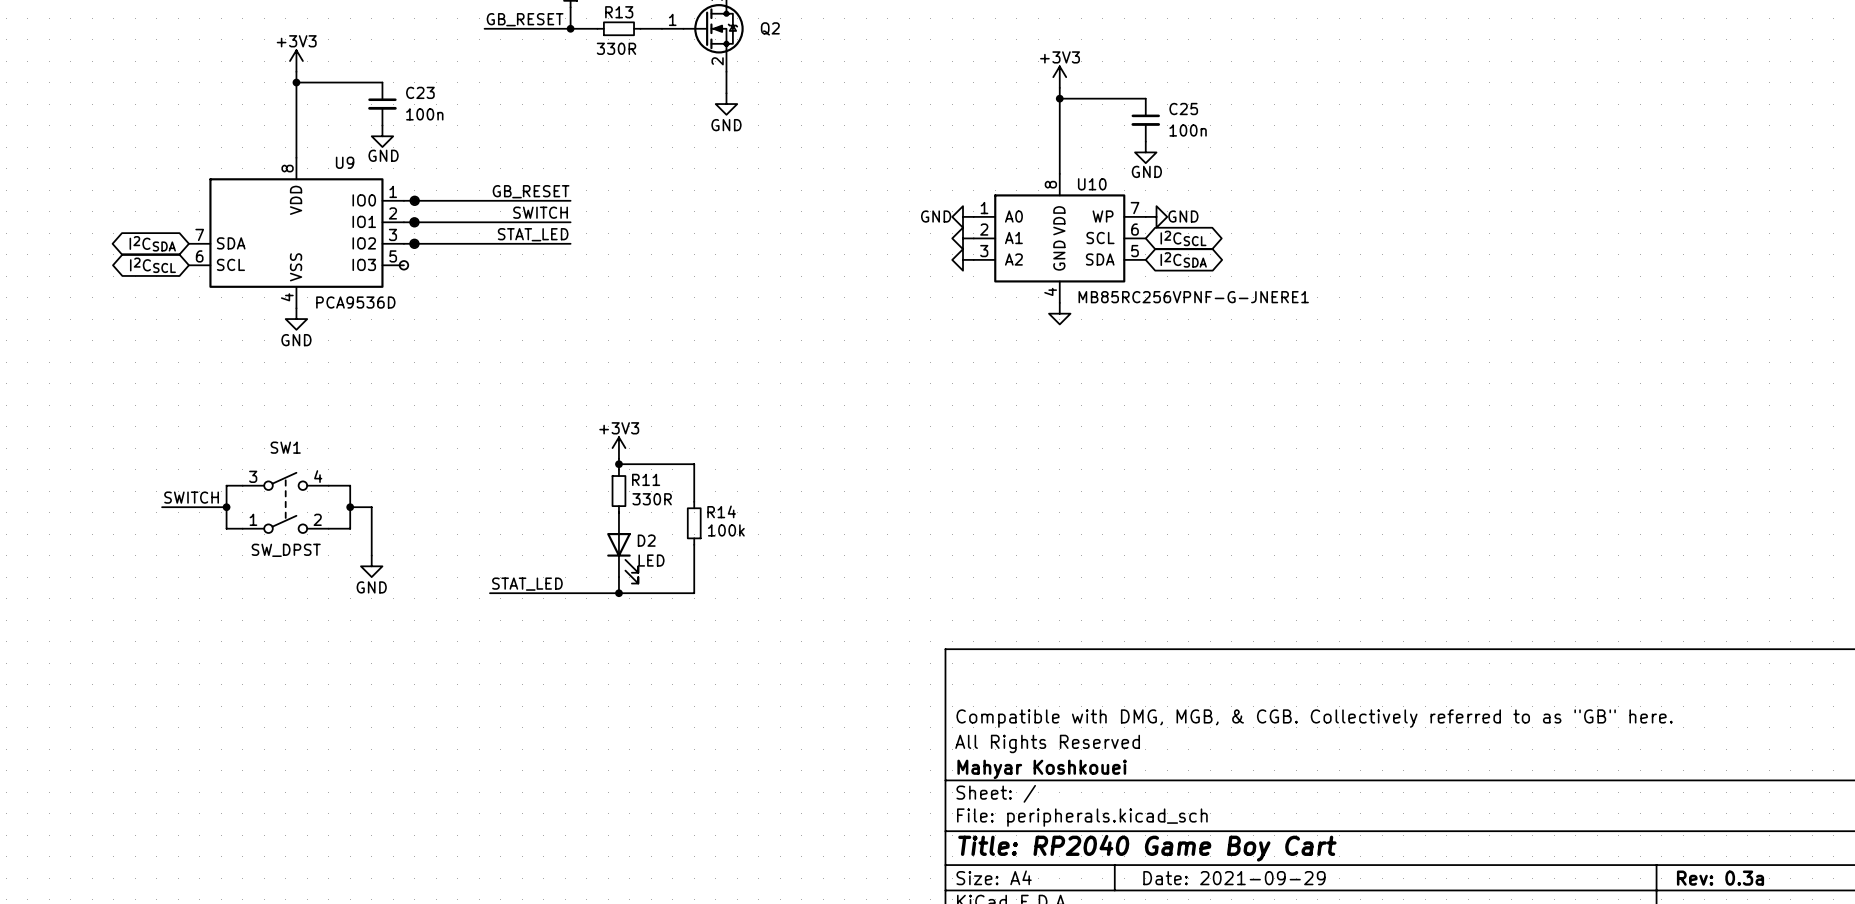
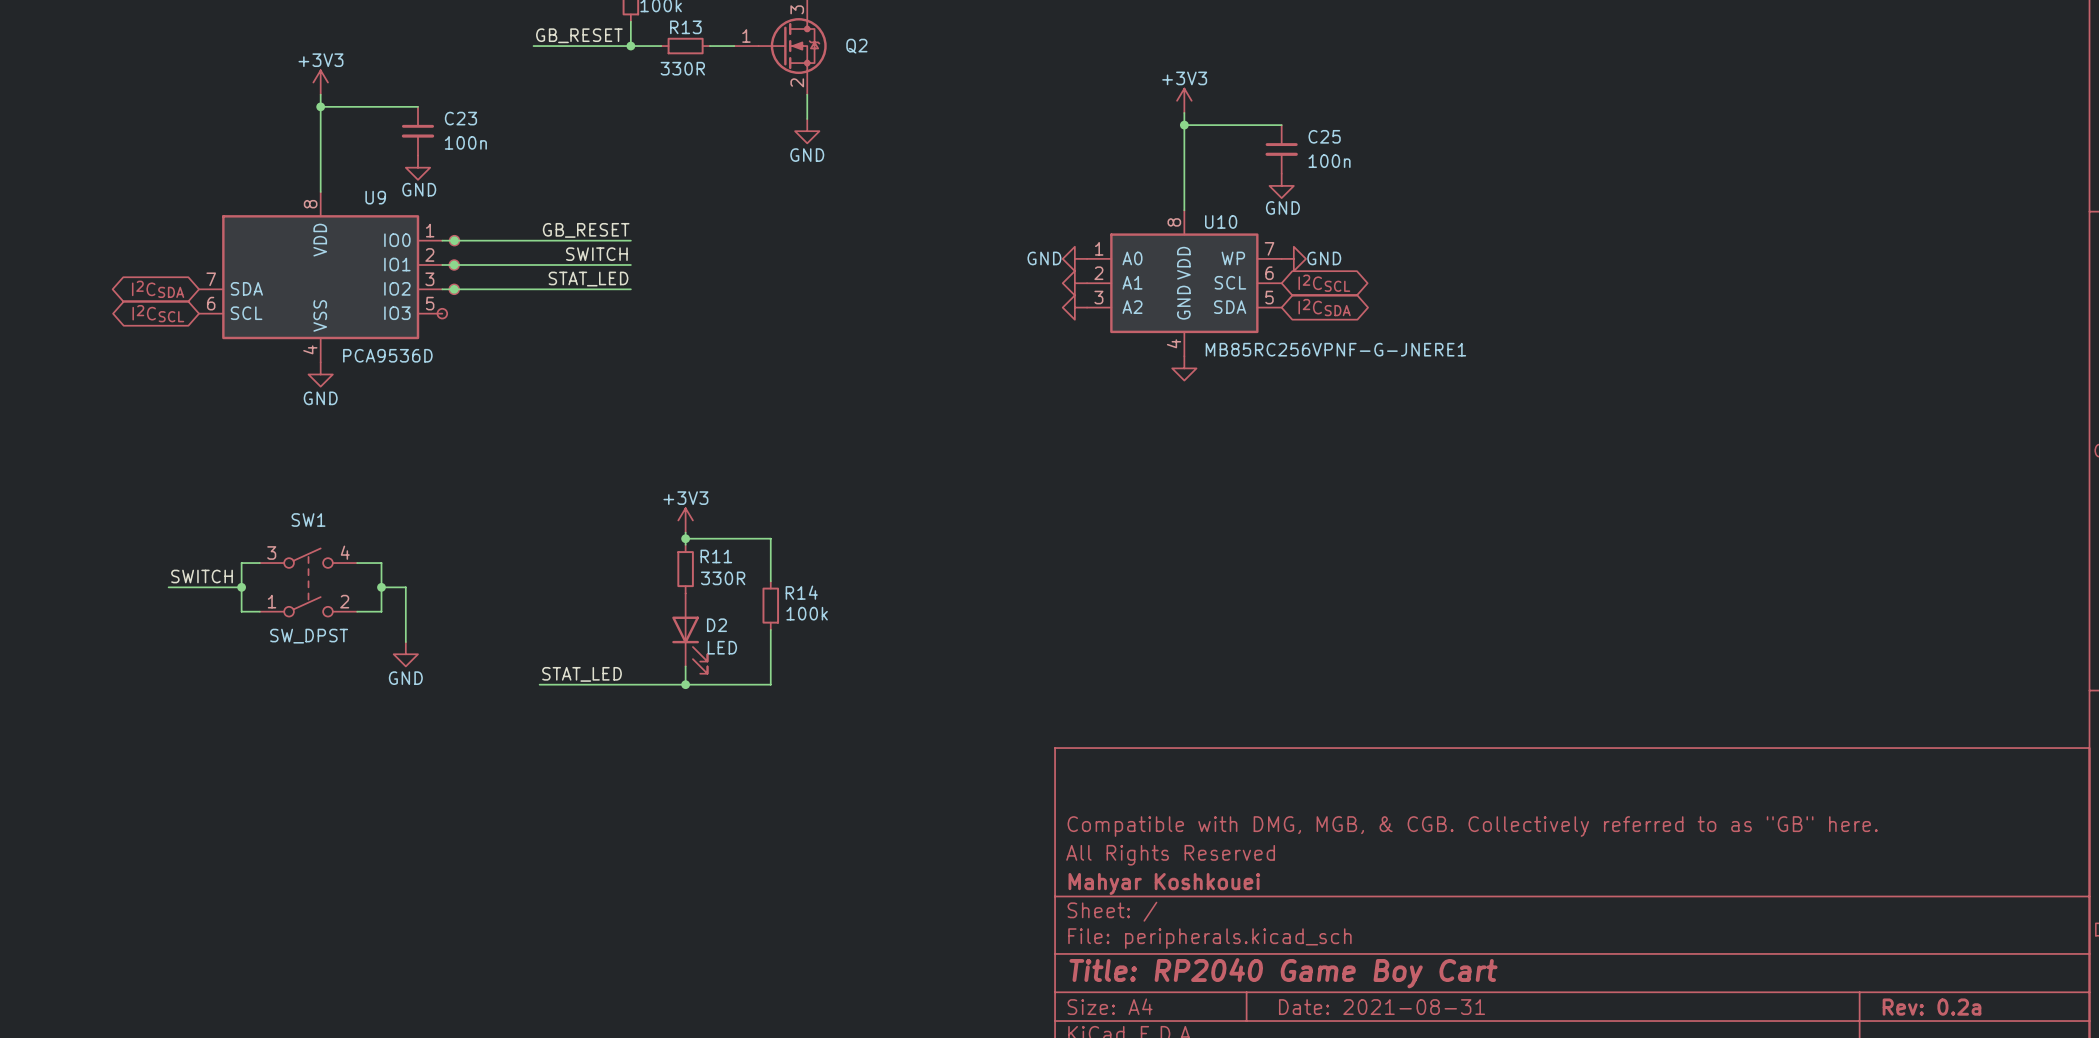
title block: Date: 2021-09-29 (1234, 878) -> Date: 2021-08-31 (1382, 1007)
title block: Rev: 0.3a (1720, 878) -> Rev: 0.2a (1931, 1007)

